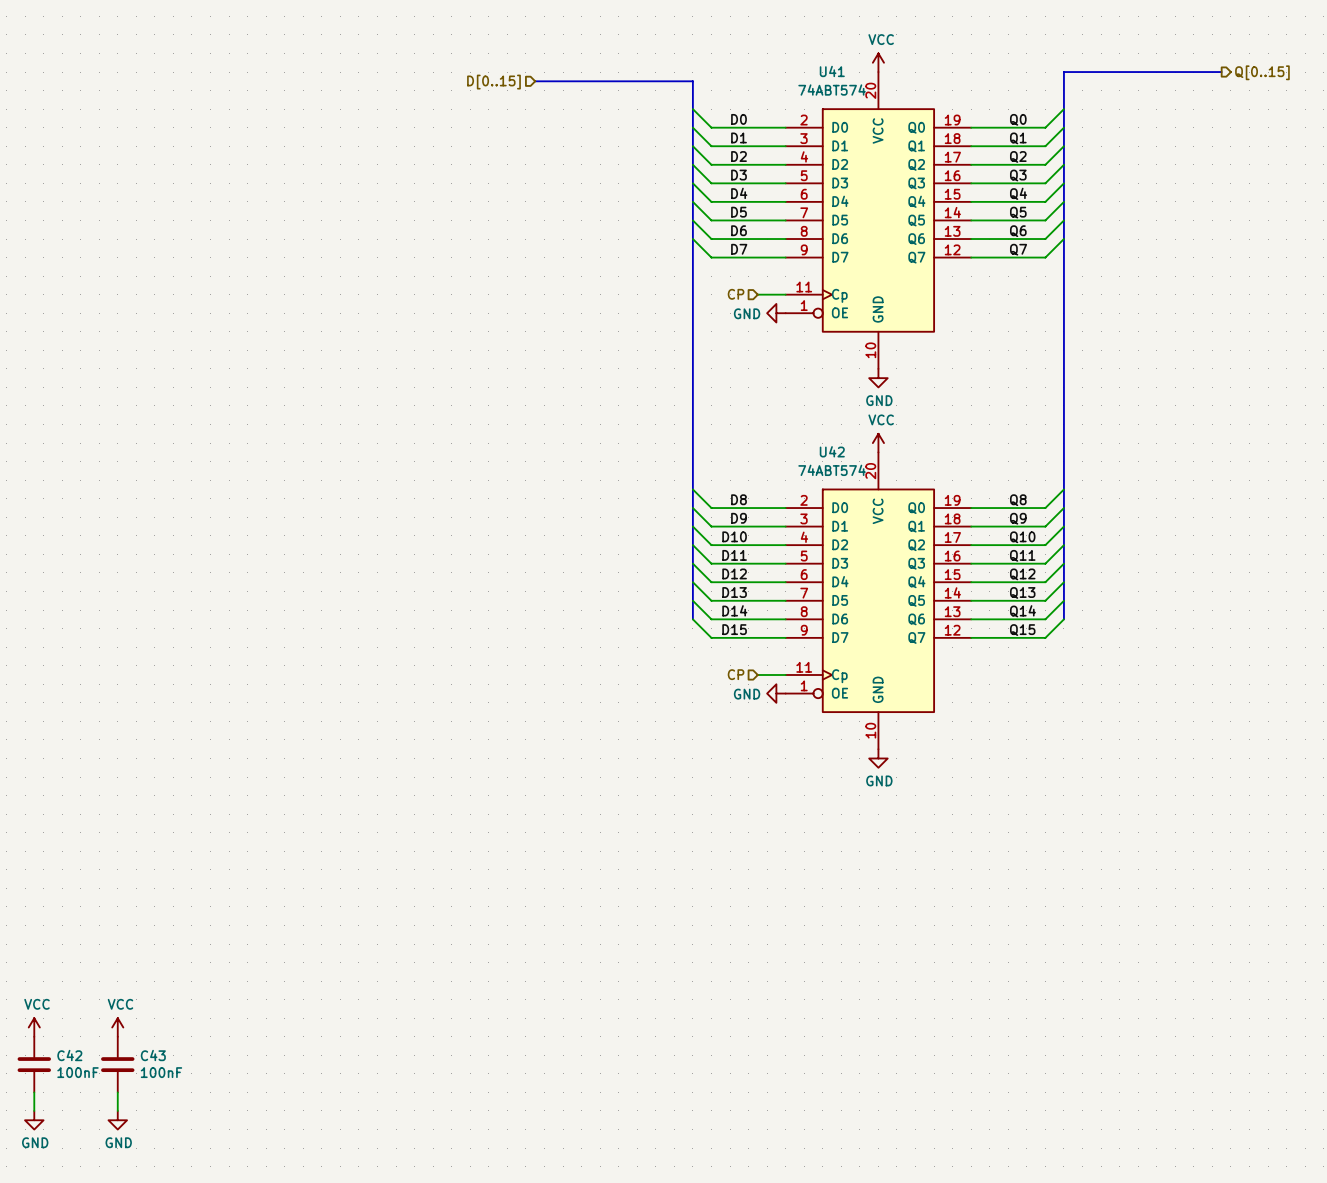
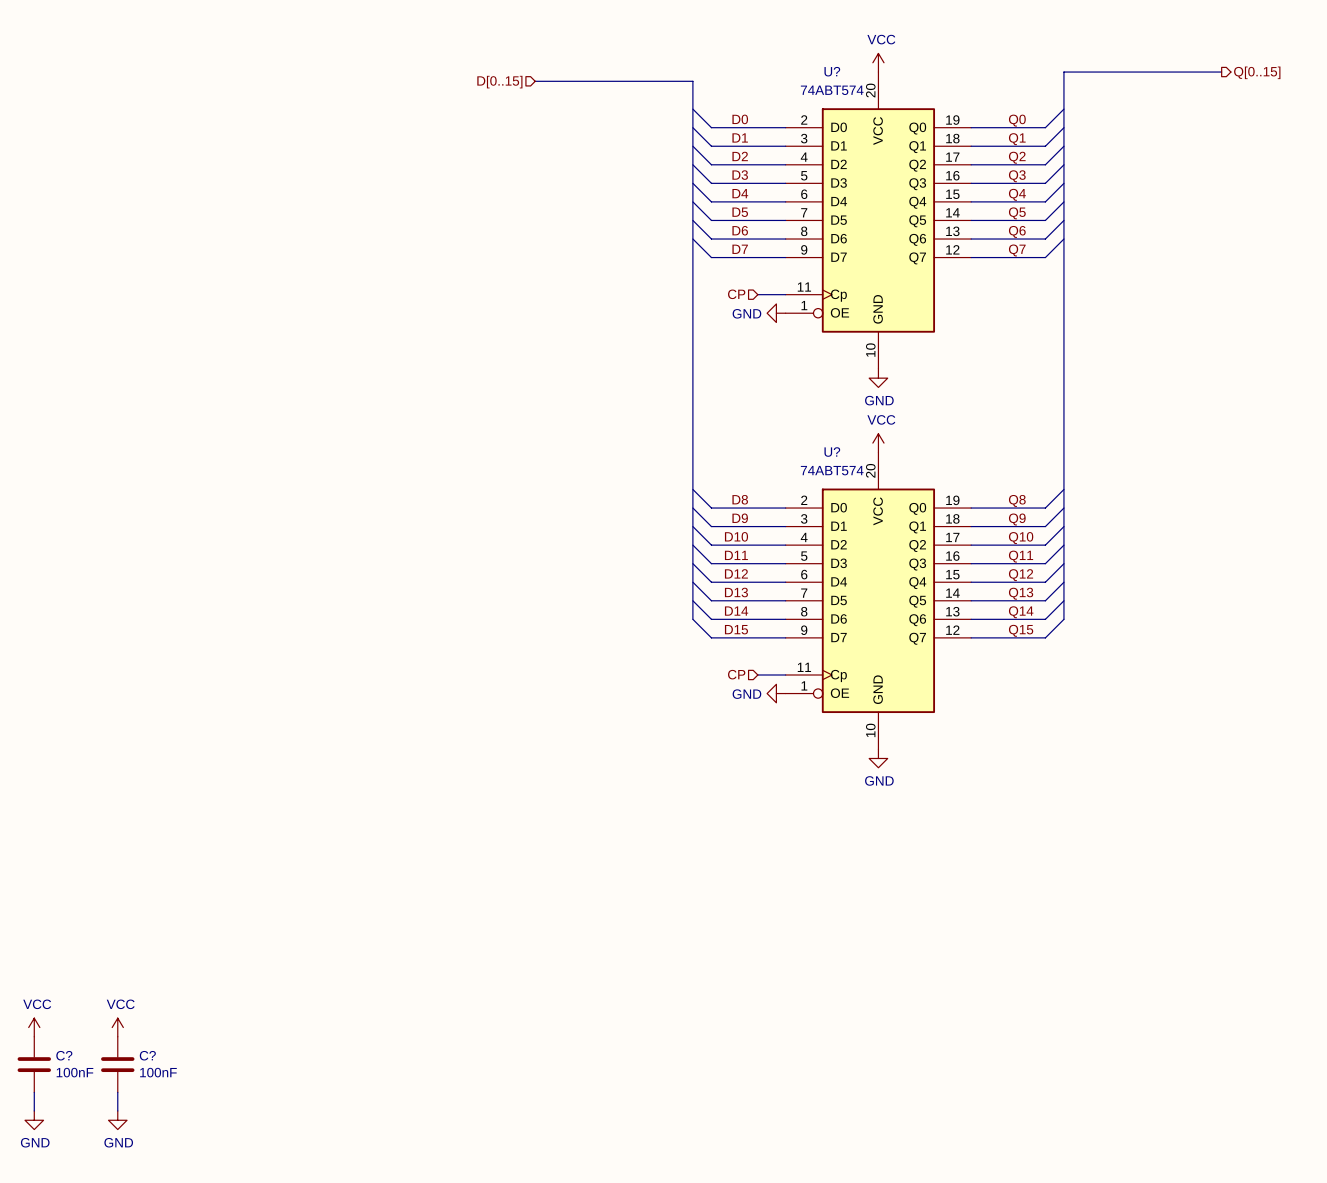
U41 name: U41 (832, 71) -> U? (832, 71)
U42 name: U42 (832, 451) -> U? (832, 452)
C42 name: C42 (69, 1055) -> C? (64, 1055)
C43 name: C43 (153, 1055) -> C? (147, 1055)

